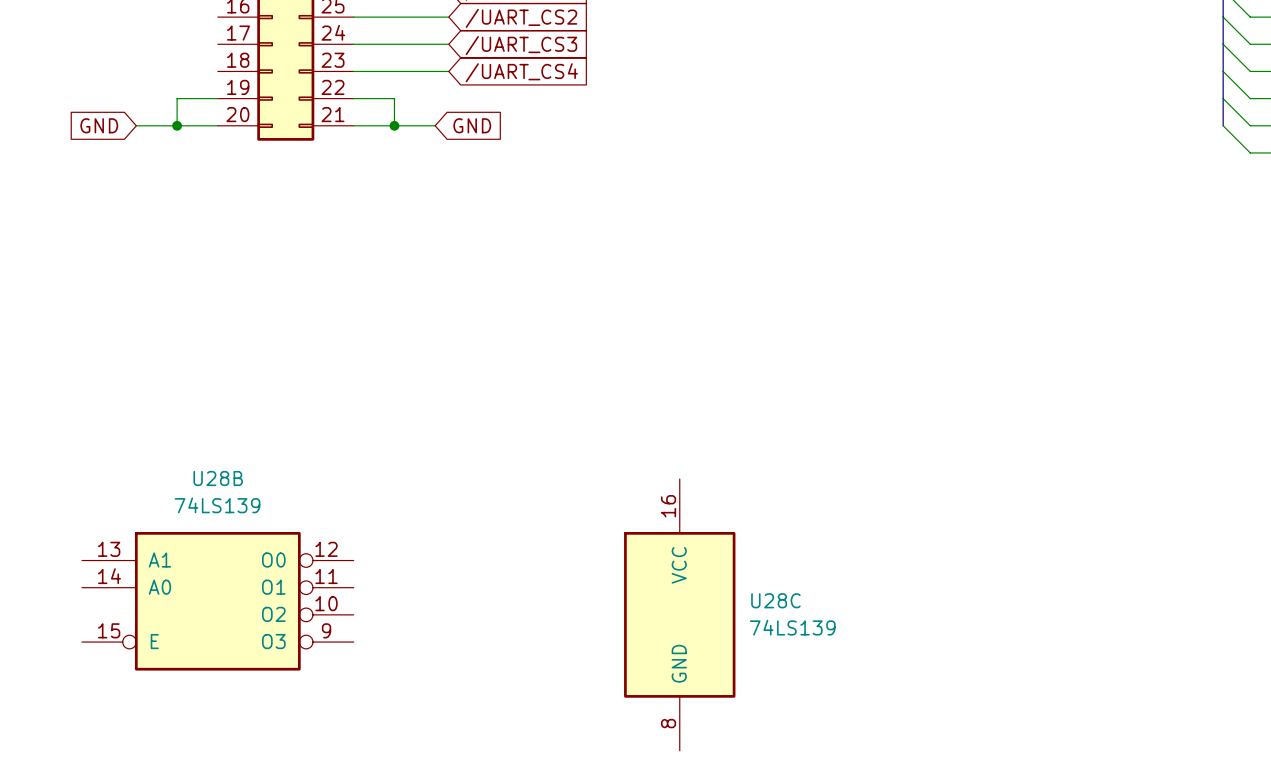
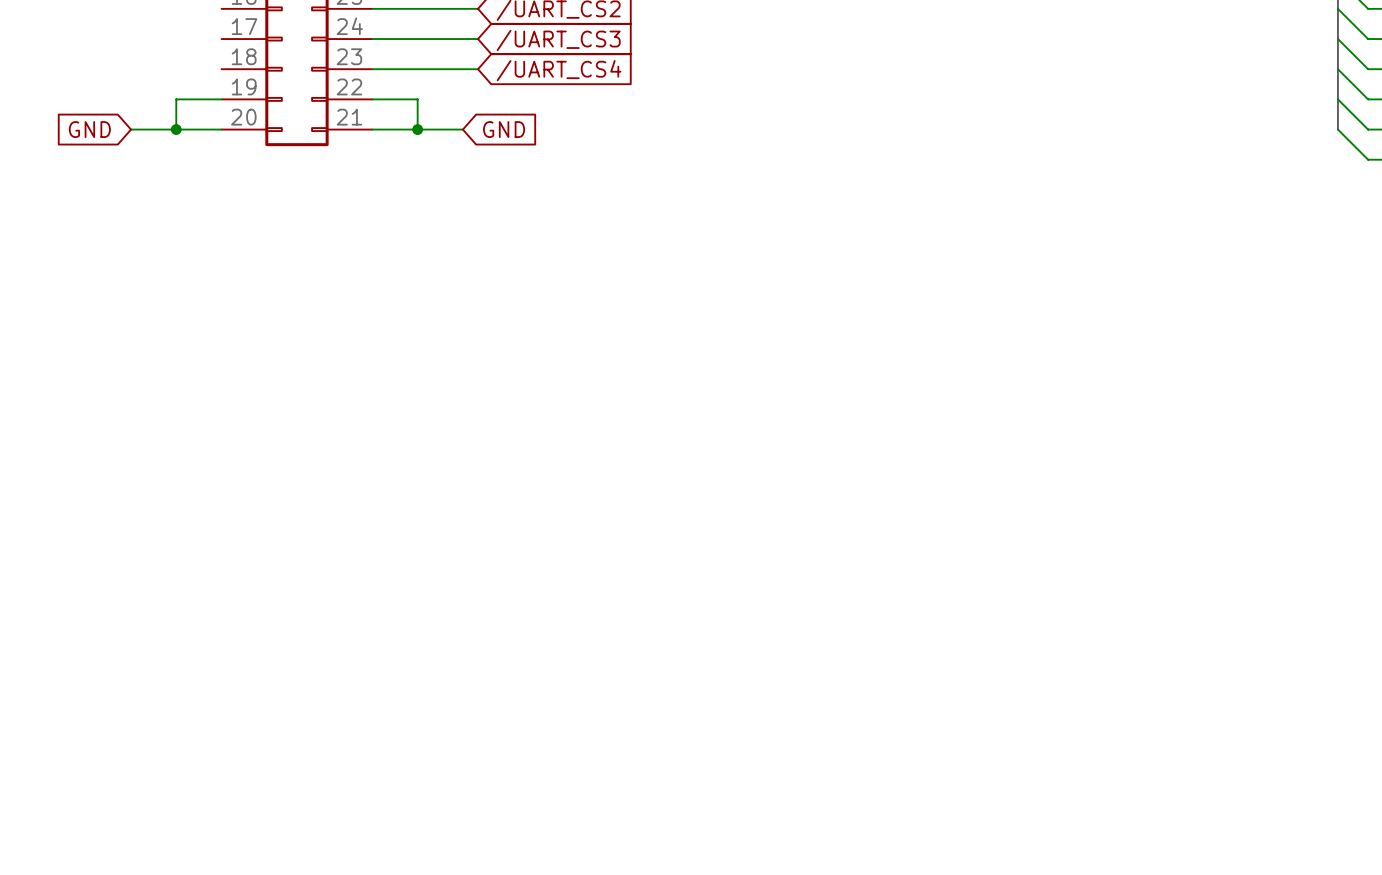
U28B: 74LS139 (217, 601) -> none
U28C: 74LS139 (679, 614) -> none

